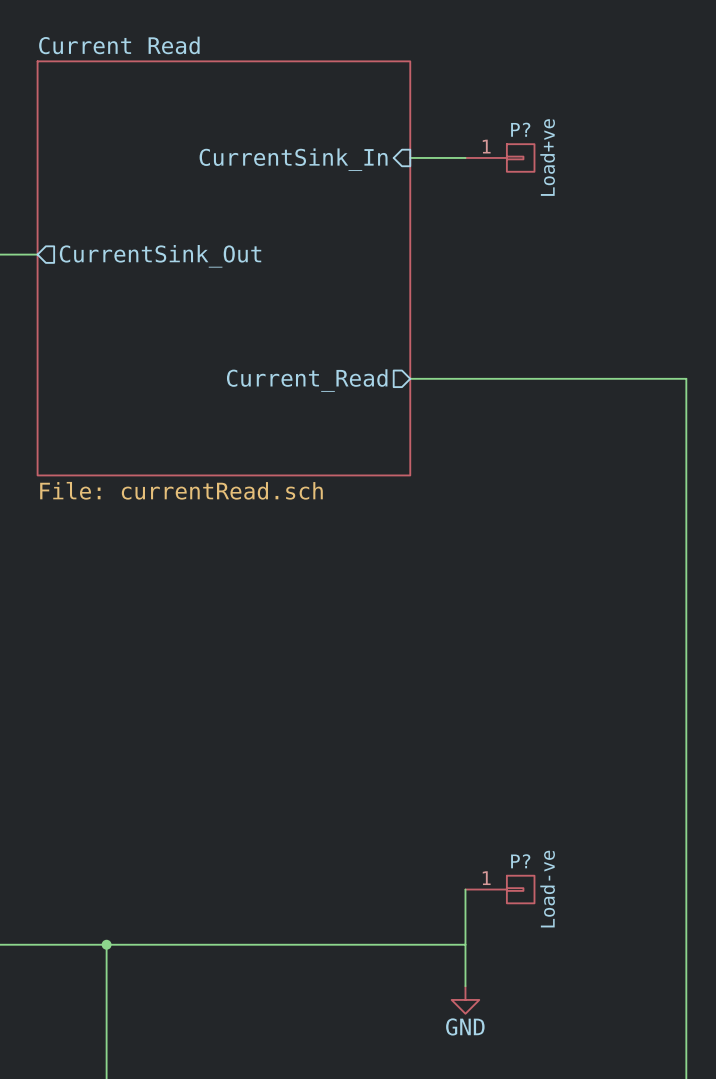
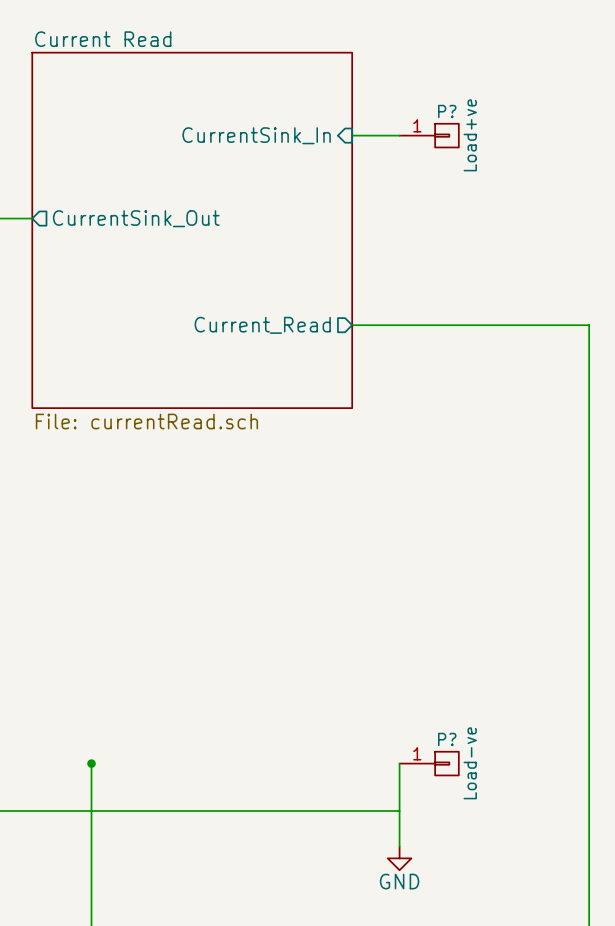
wire: none -> (91, 763) (91, 810)
junction position: (106, 944) -> (91, 763)

